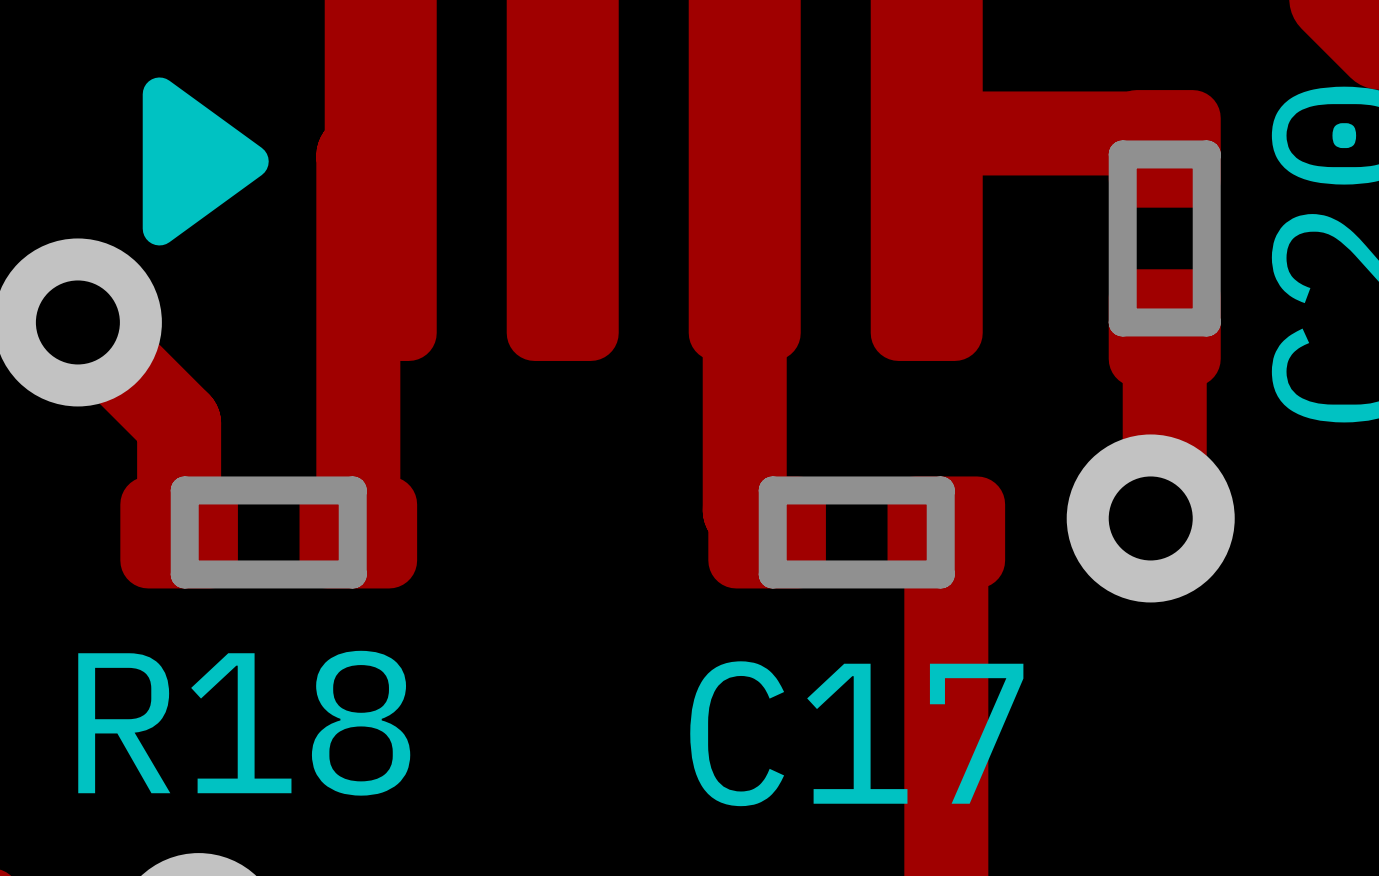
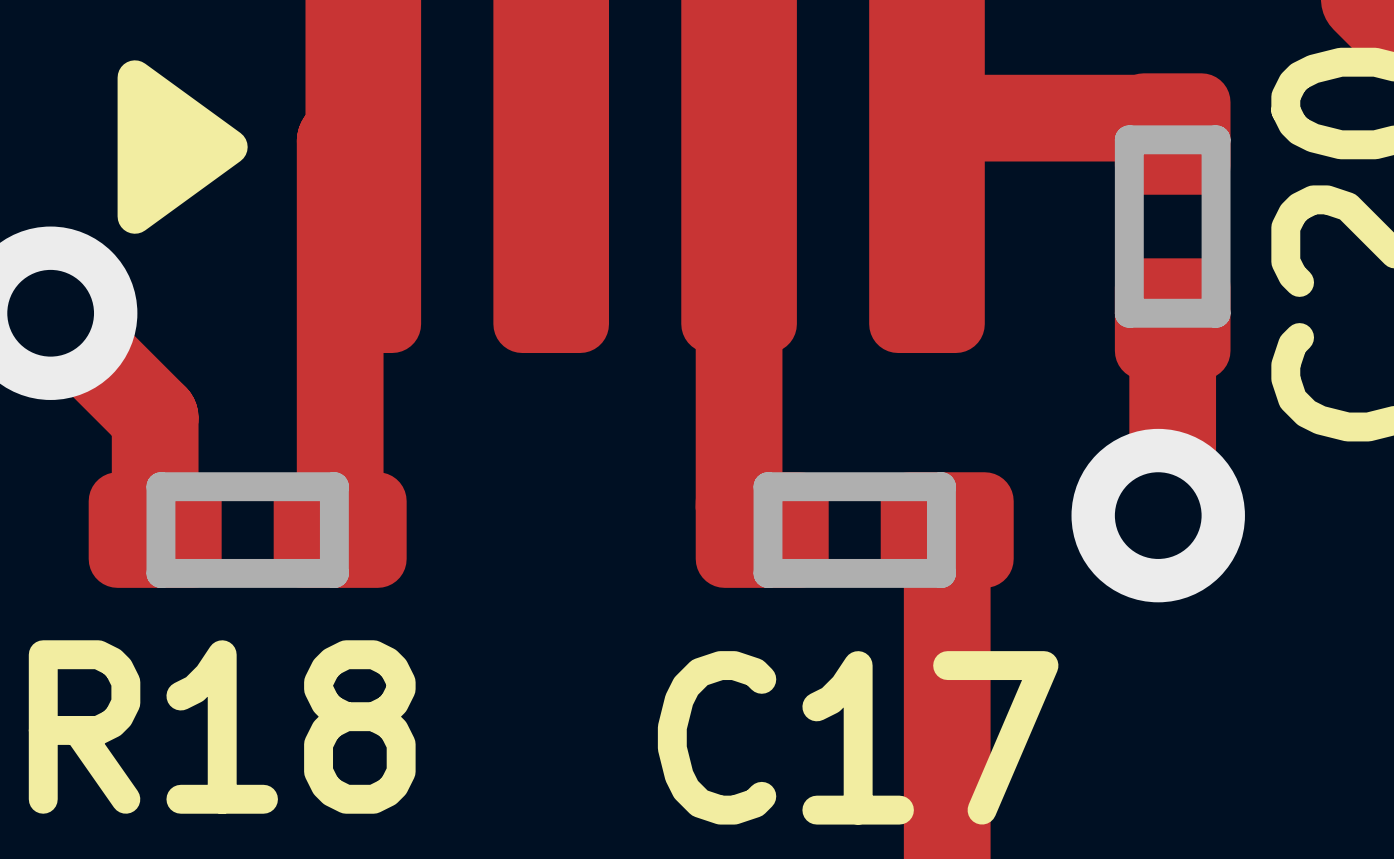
R18 footprint: [120, 476, 418, 589] -> [88, 472, 407, 588]
C17 footprint: [708, 476, 1006, 589] -> [695, 472, 1014, 588]

